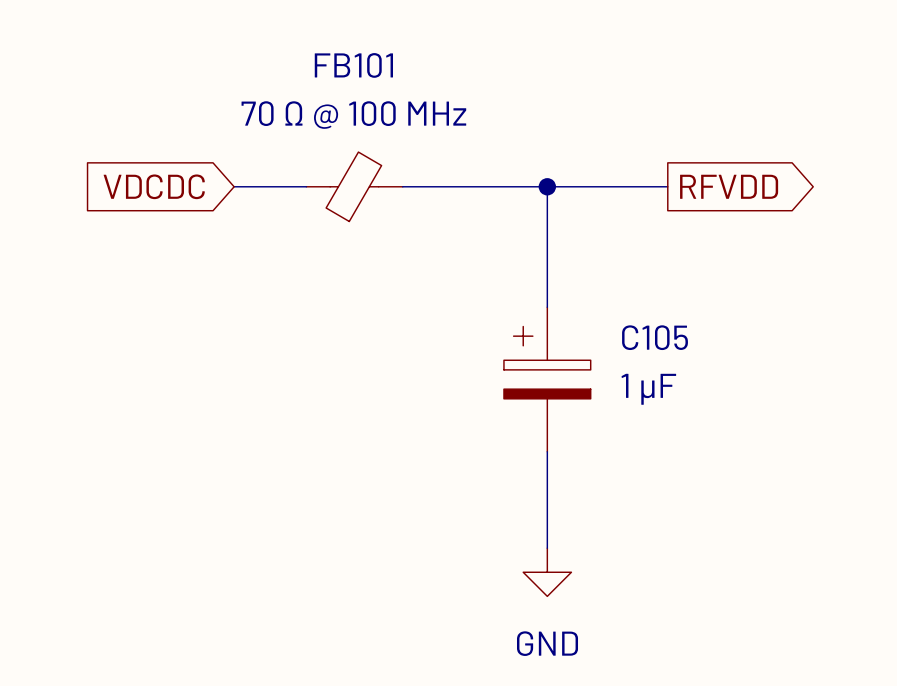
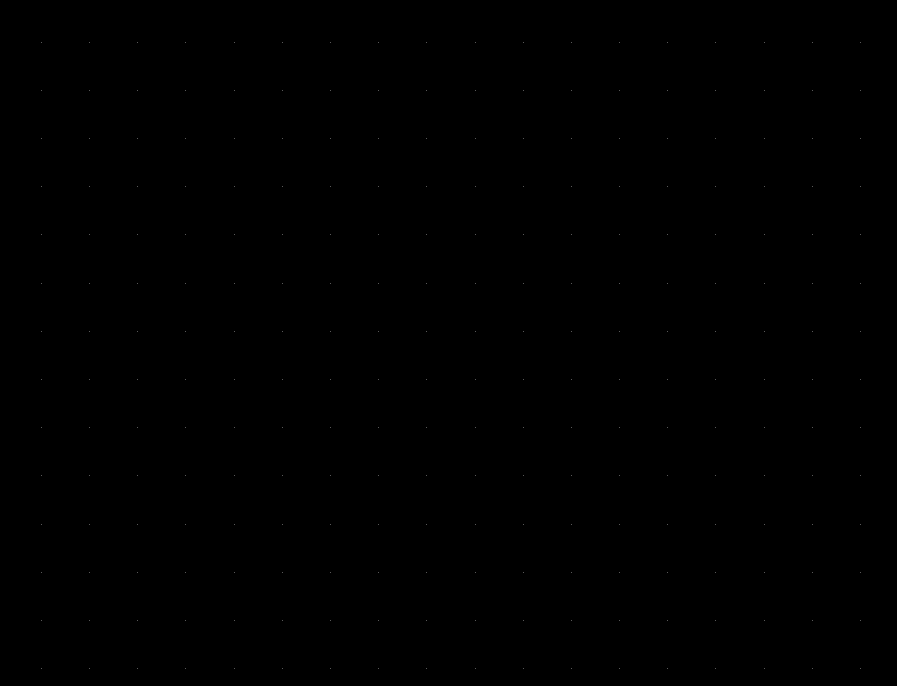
global label: VDCDC (154, 186) -> none
wire: (234, 186) (306, 186) -> none
FB101: 70 Ω @ 100 MHz (354, 186) -> none
wire: (402, 186) (667, 186) -> none
wire: (547, 186) (547, 307) -> none
junction: (547, 186) -> none
global label: RFVDD (729, 186) -> none
C105: 1 µF (547, 379) -> none
wire: (547, 451) (547, 548) -> none
power symbol: GND (547, 572) -> none

